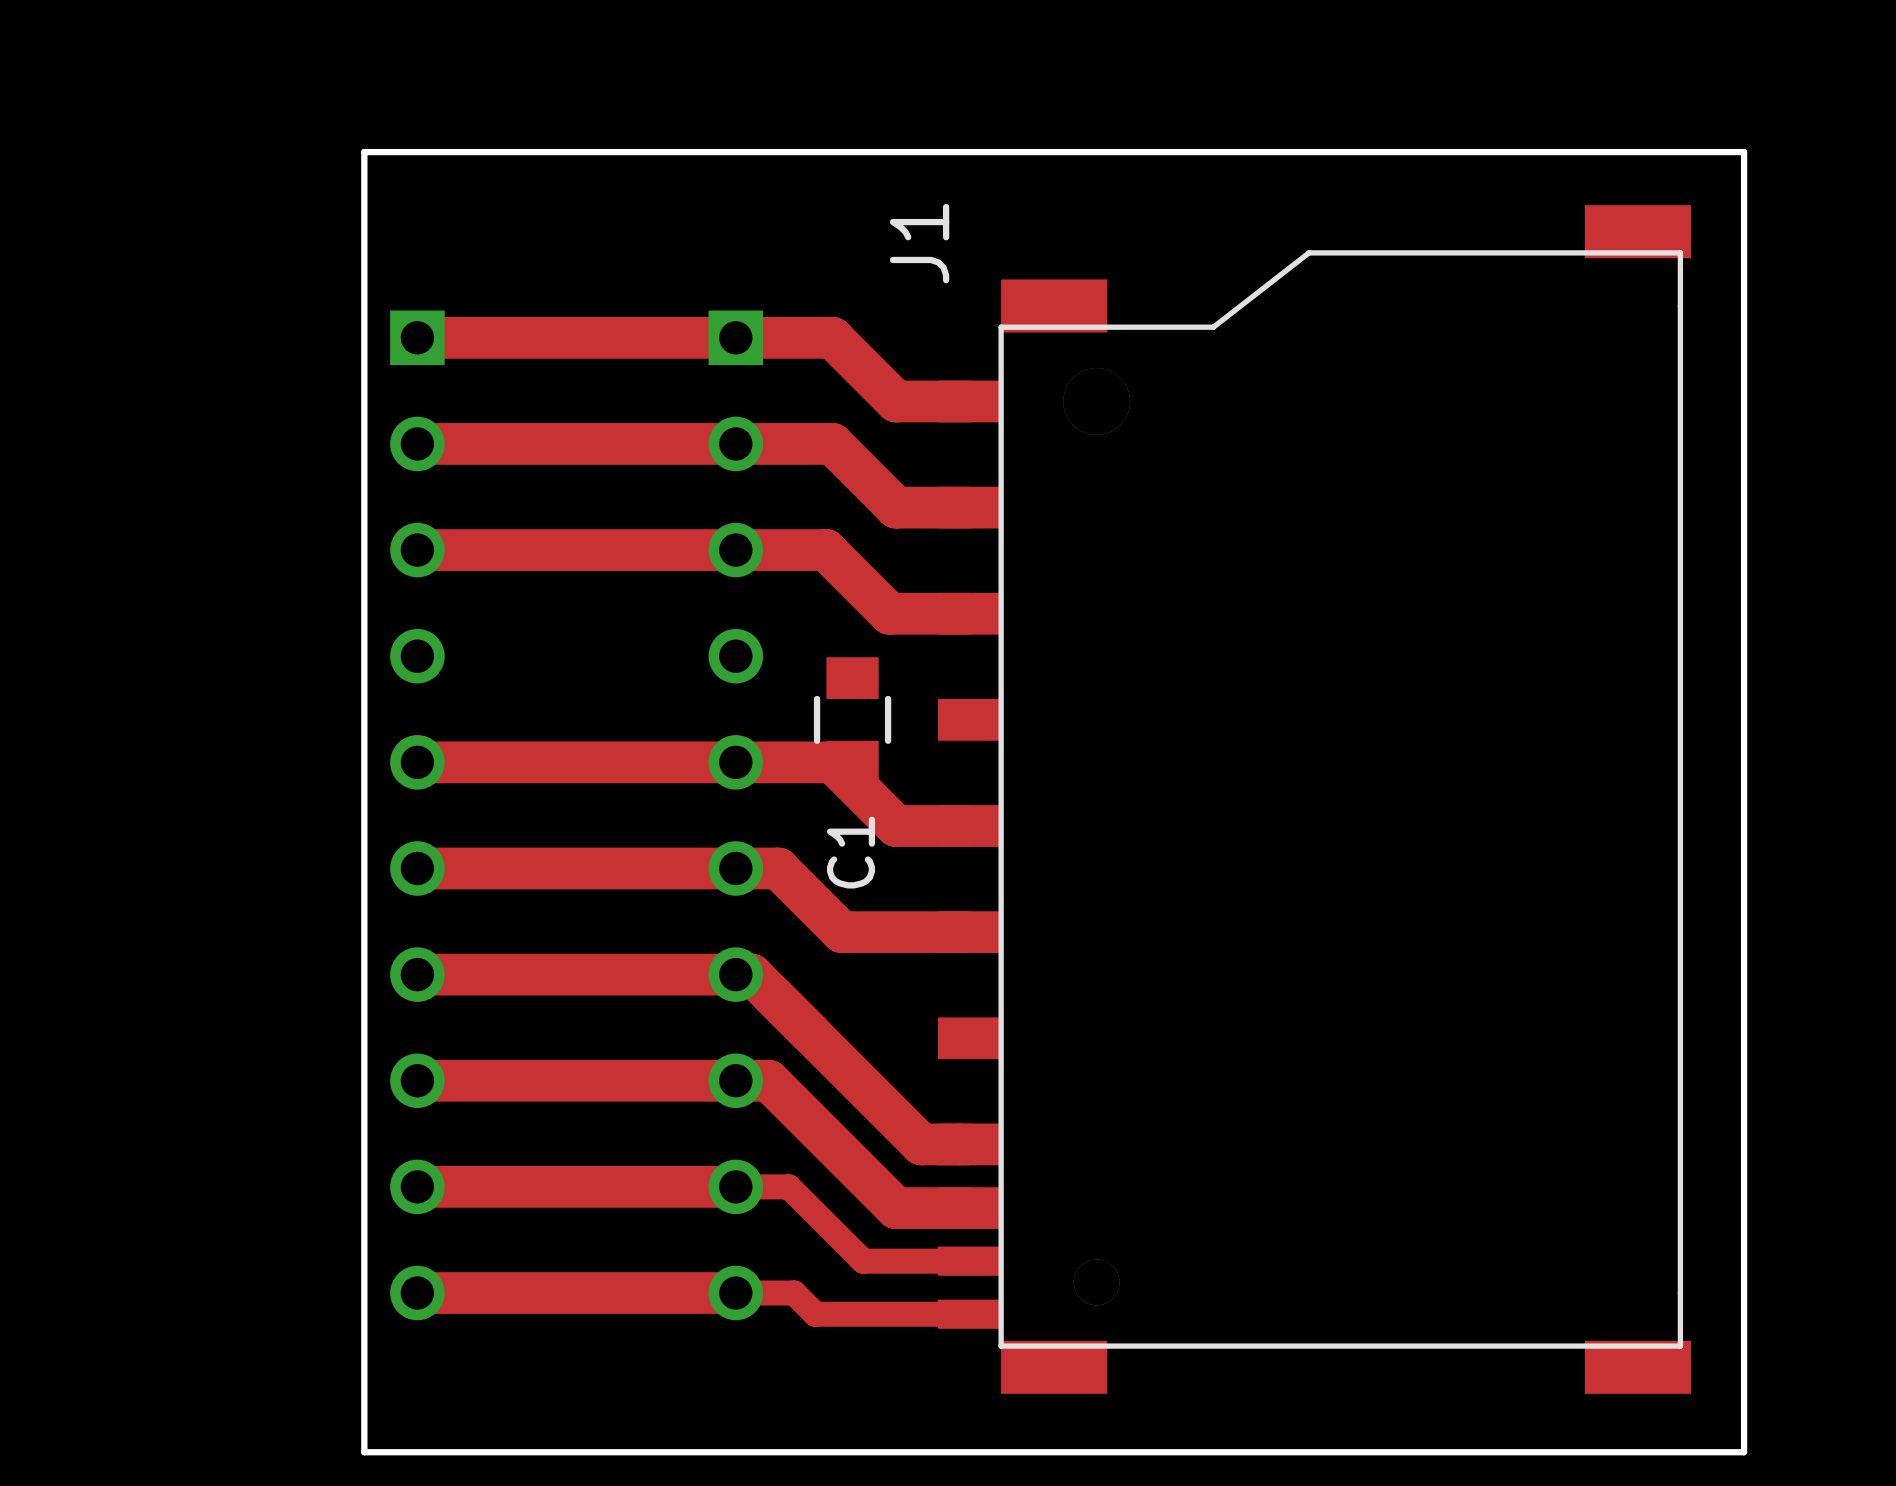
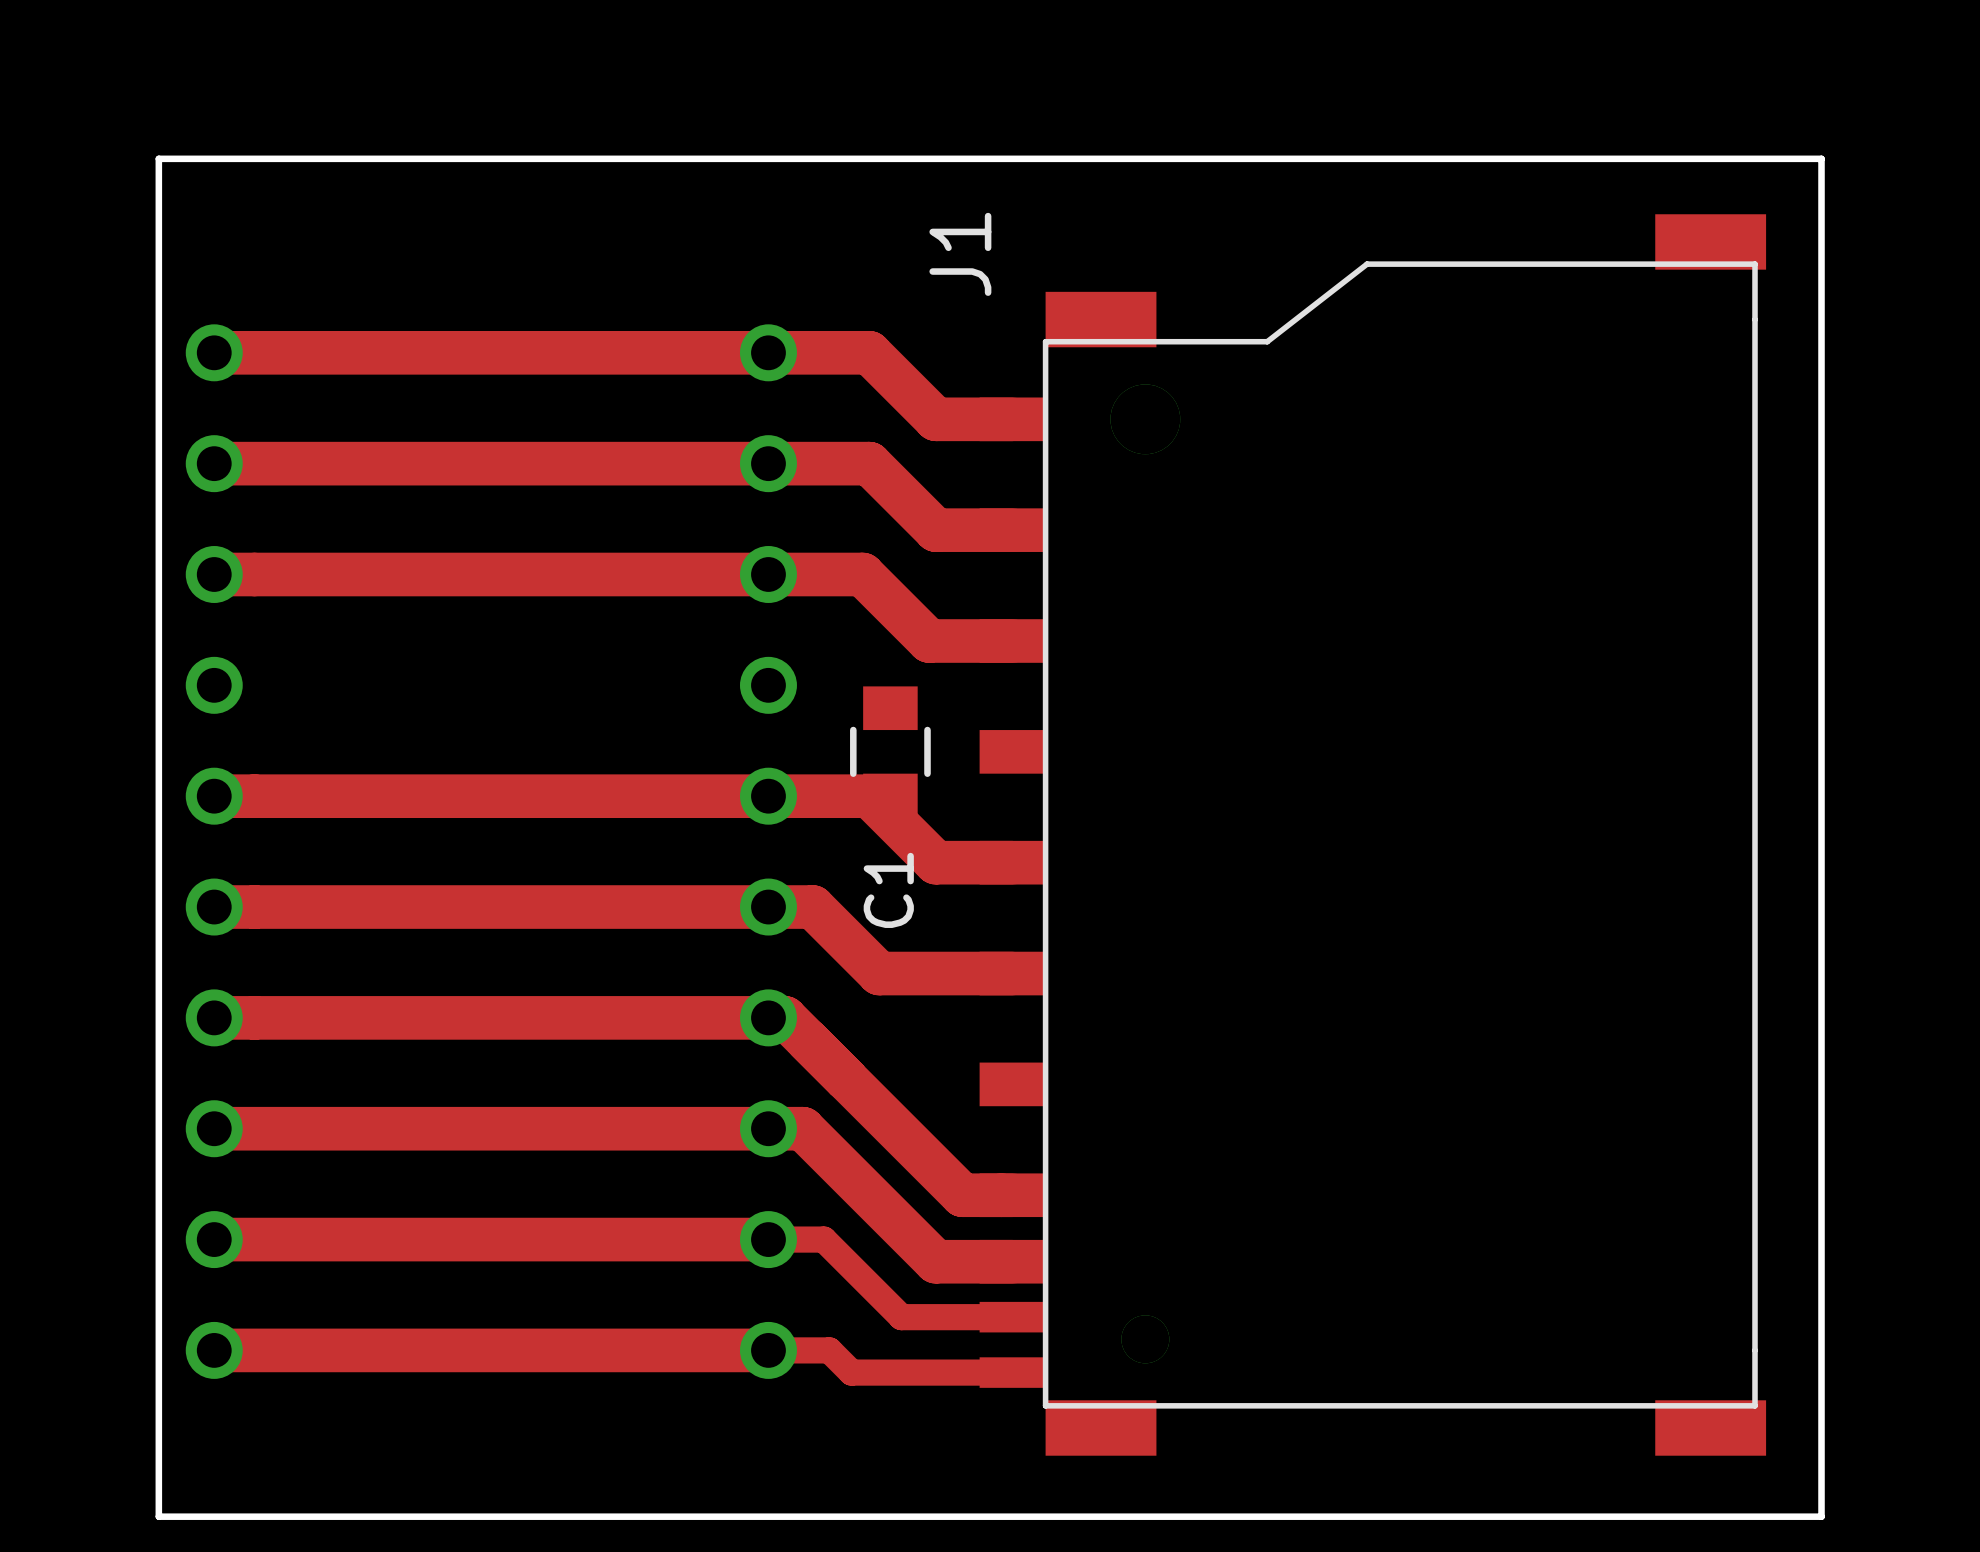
board edge: (364, 152) (364, 1452) -> (380, 158) (158, 158) (158, 1516) (380, 1516)
part footprint: [708, 310, 764, 1321] -> [739, 324, 797, 1379]
top track: none -> (214, 352) (435, 352)
top track: none -> (214, 463) (435, 463)
top track: none -> (214, 574) (435, 574)
top track: none -> (214, 796) (435, 796)
part: none -> (214, 851)
part: (417, 815) -> none
top track: none -> (214, 907) (435, 907)
top track: none -> (214, 1017) (435, 1017)
top track: none -> (214, 1128) (435, 1128)
top track: none -> (214, 1239) (435, 1239)
top track: none -> (214, 1350) (435, 1350)

